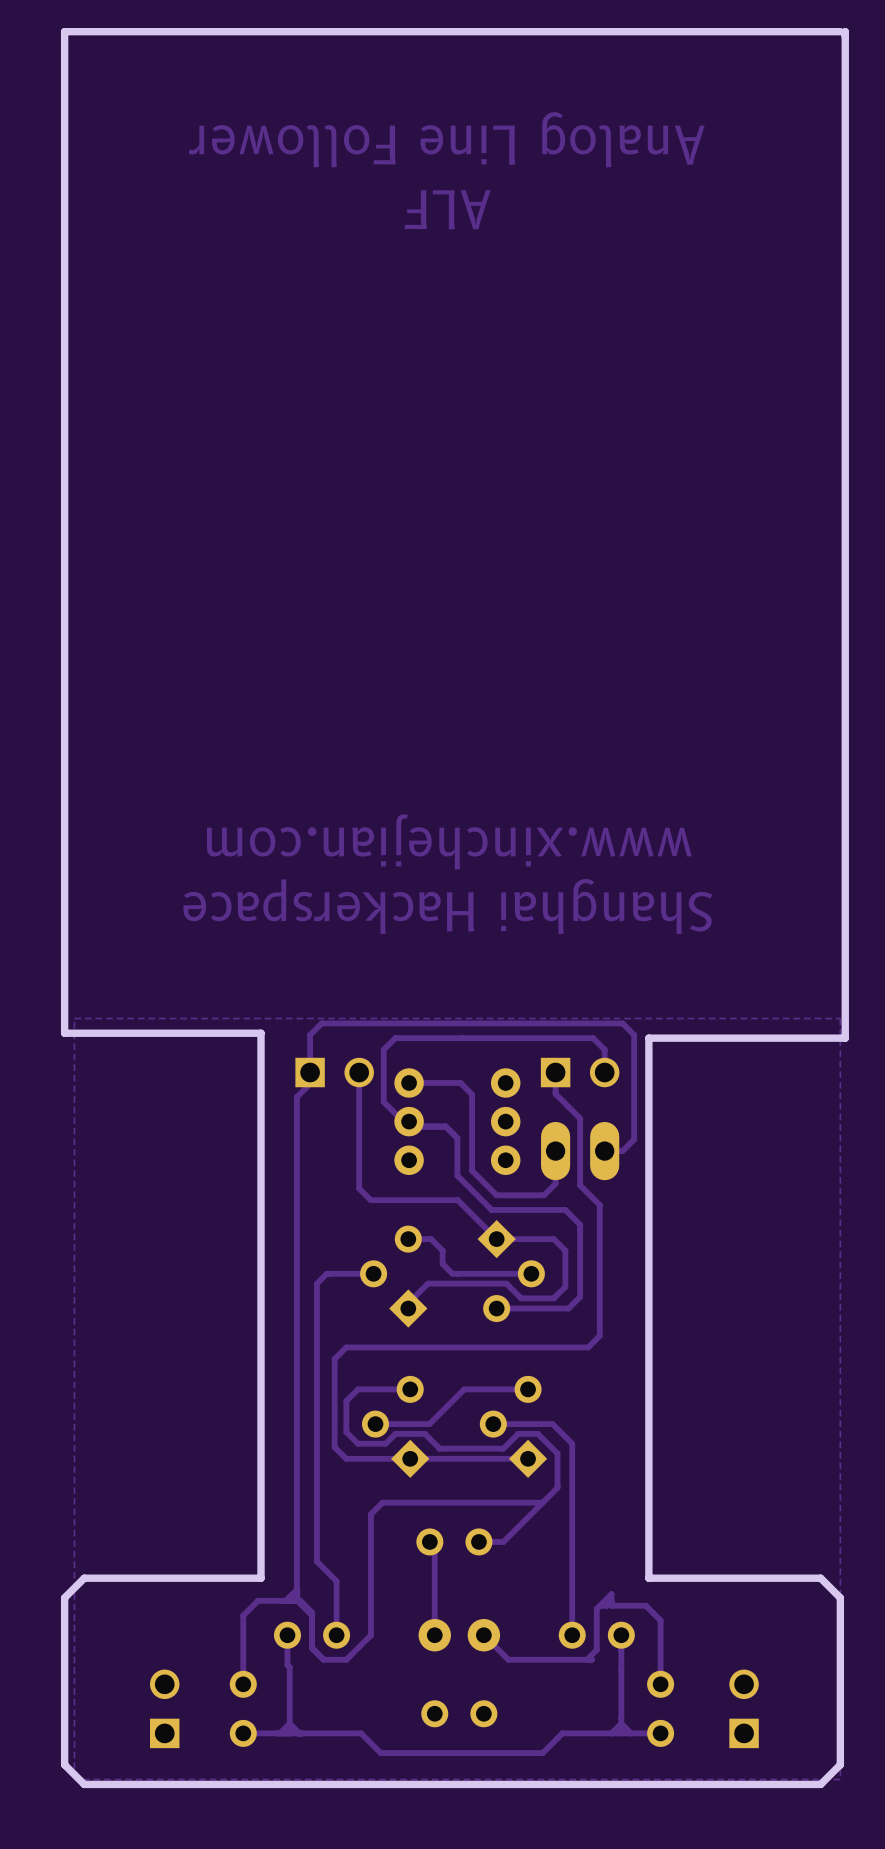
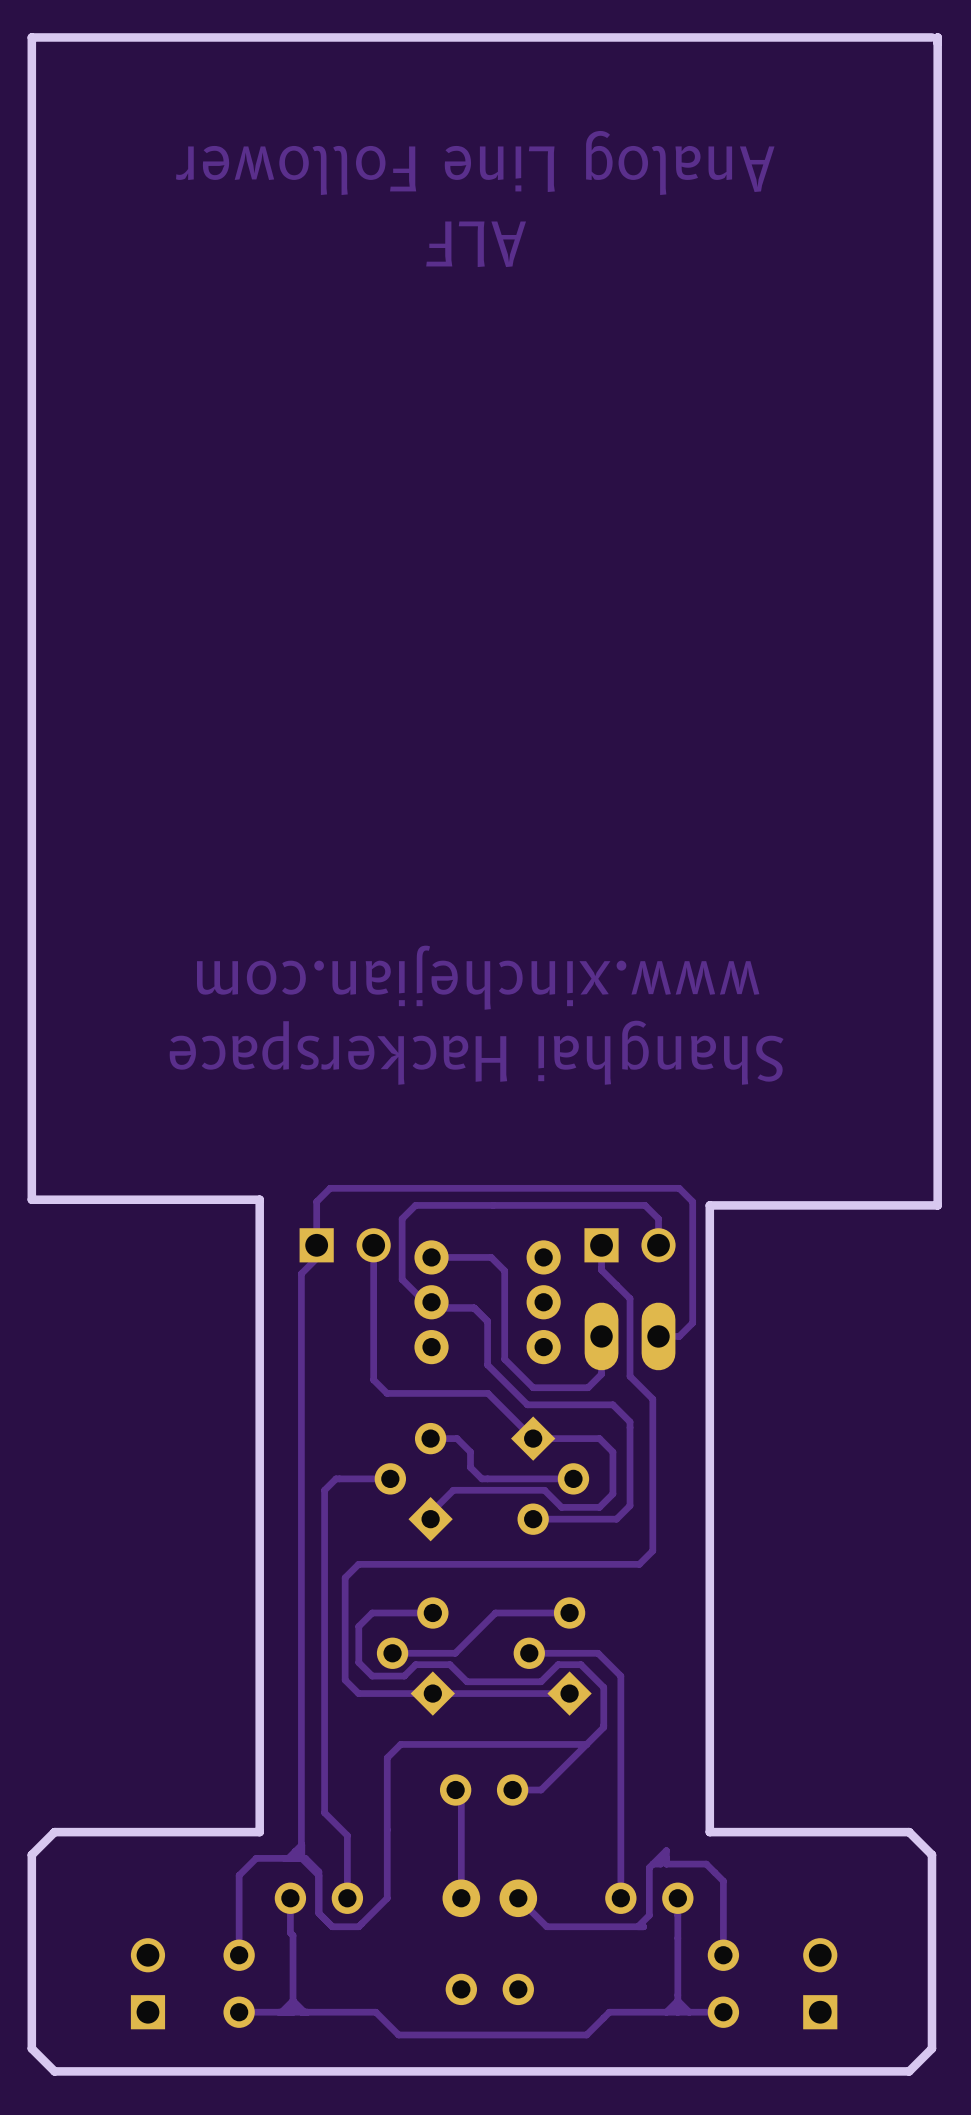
zone outline: (840, 1018) (74, 1018) (74, 1779) (840, 1779) (840, 1018) -> none

